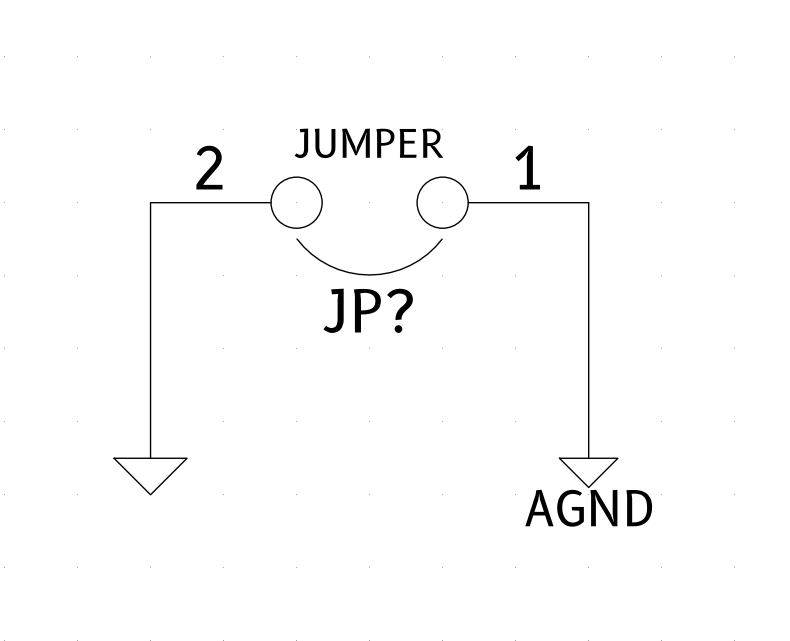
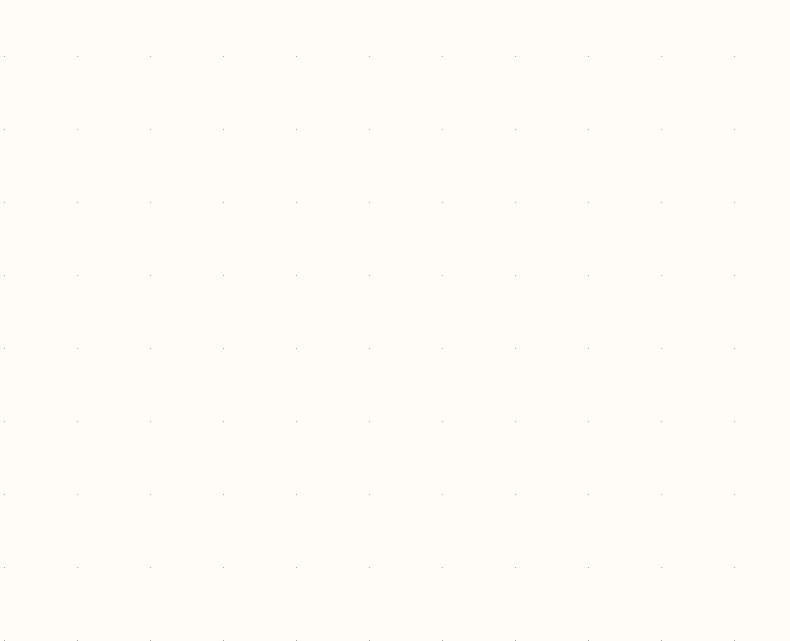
wire: (150, 202) (150, 458) -> none
wire: (588, 202) (588, 458) -> none
JP?: JUMPER (369, 226) -> none
power symbol: AGND (588, 472) -> none
power symbol: (150, 476) -> none

